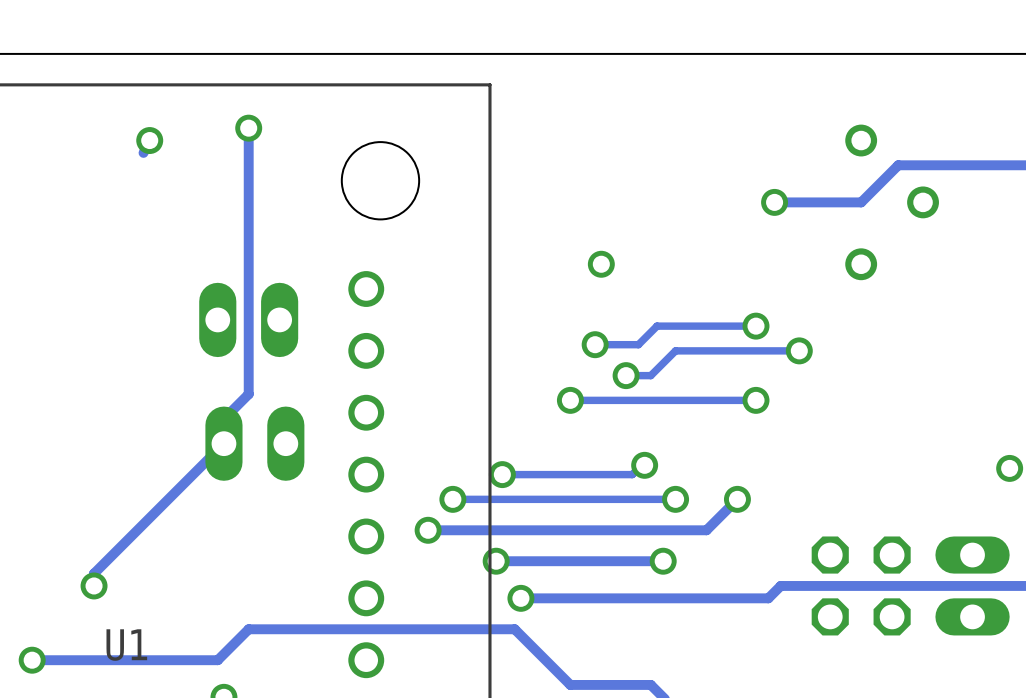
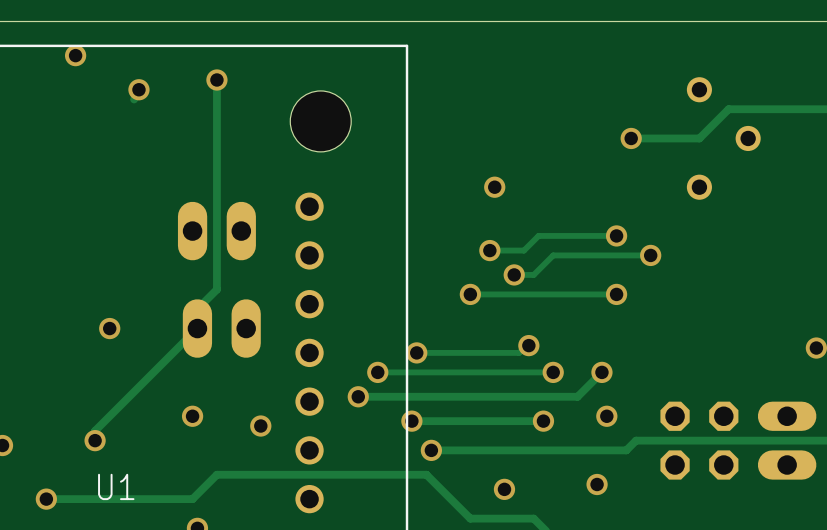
via: none -> (75, 55)
via: none -> (109, 328)
via: none -> (192, 416)
via: none -> (606, 416)
via: none -> (260, 426)
via: none -> (597, 484)
via: none -> (504, 489)

